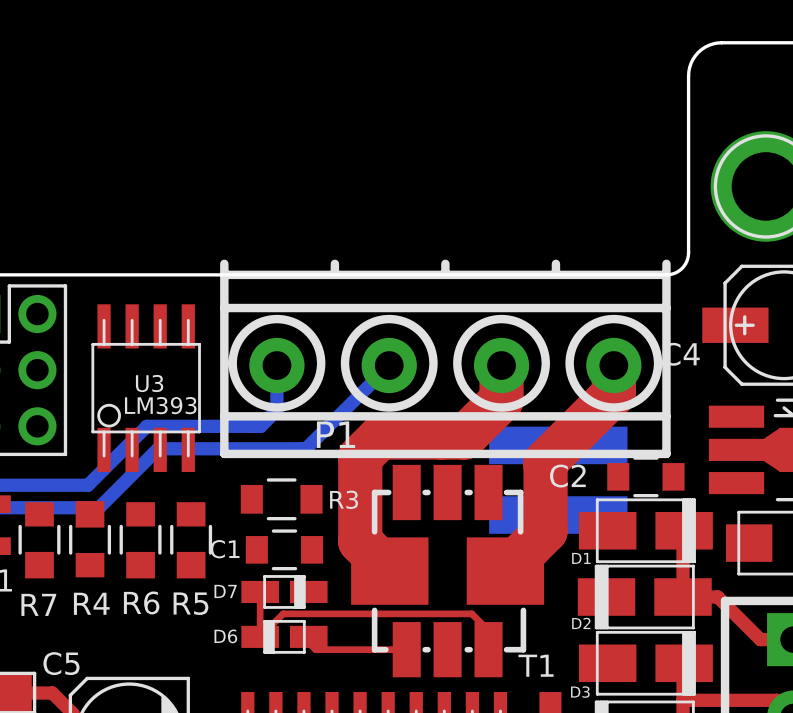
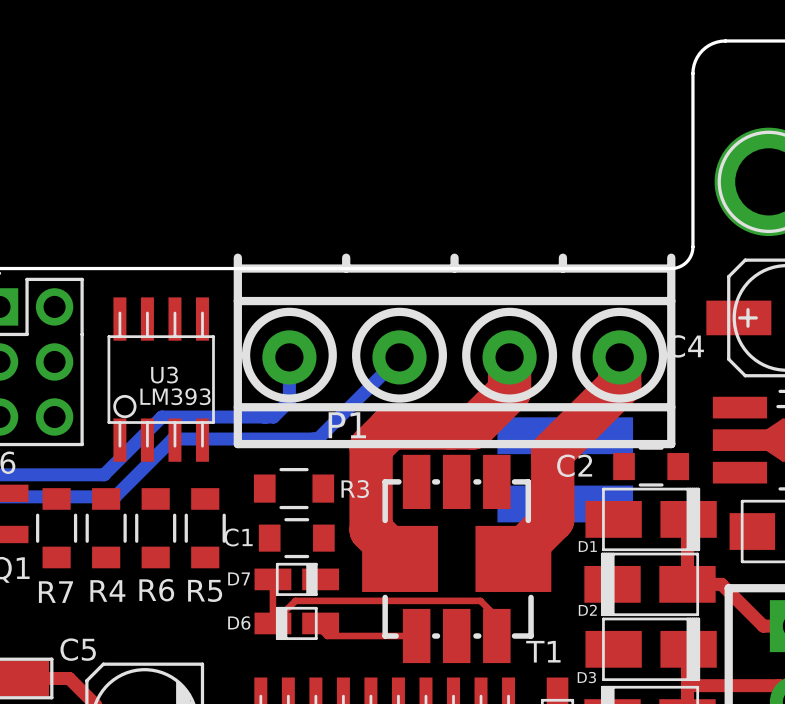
R4 footprint: [69, 501, 112, 578] -> [85, 488, 127, 569]
R7 footprint: [18, 502, 61, 579] -> [36, 488, 78, 569]
R6 footprint: [119, 502, 162, 579] -> [135, 488, 177, 569]
R5 footprint: [170, 502, 213, 579] -> [184, 488, 226, 569]

